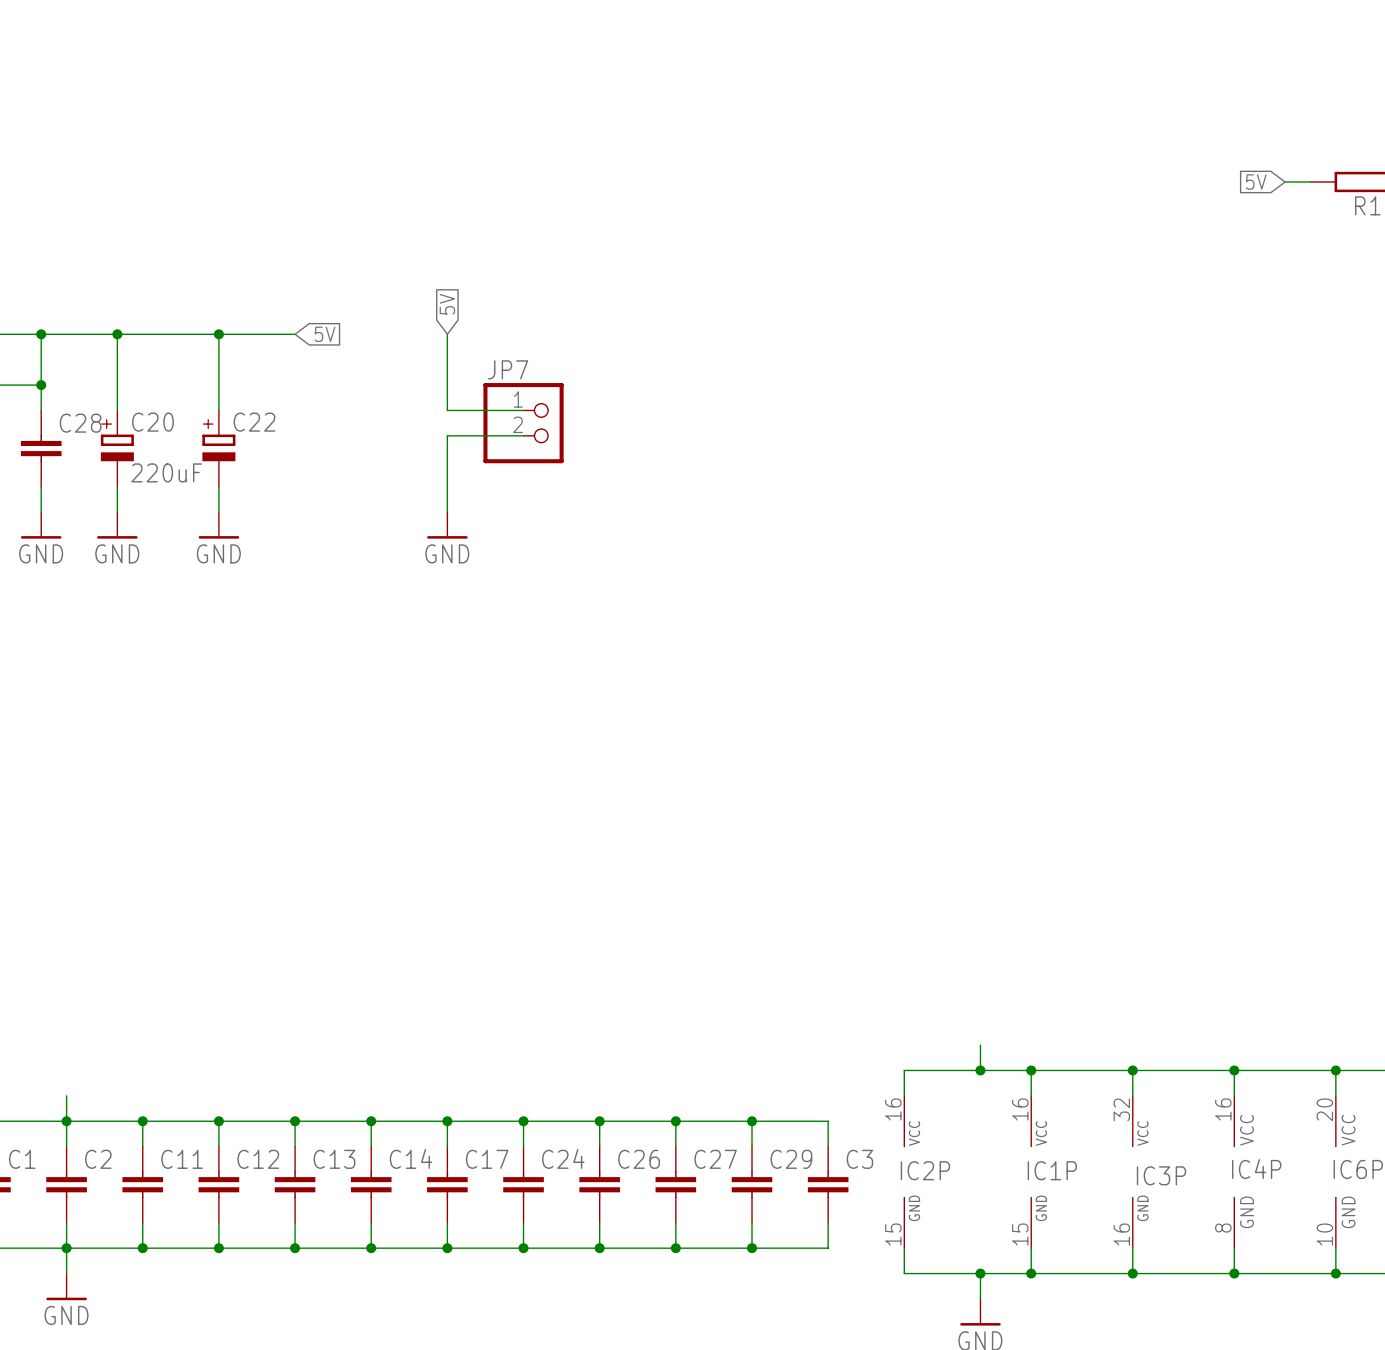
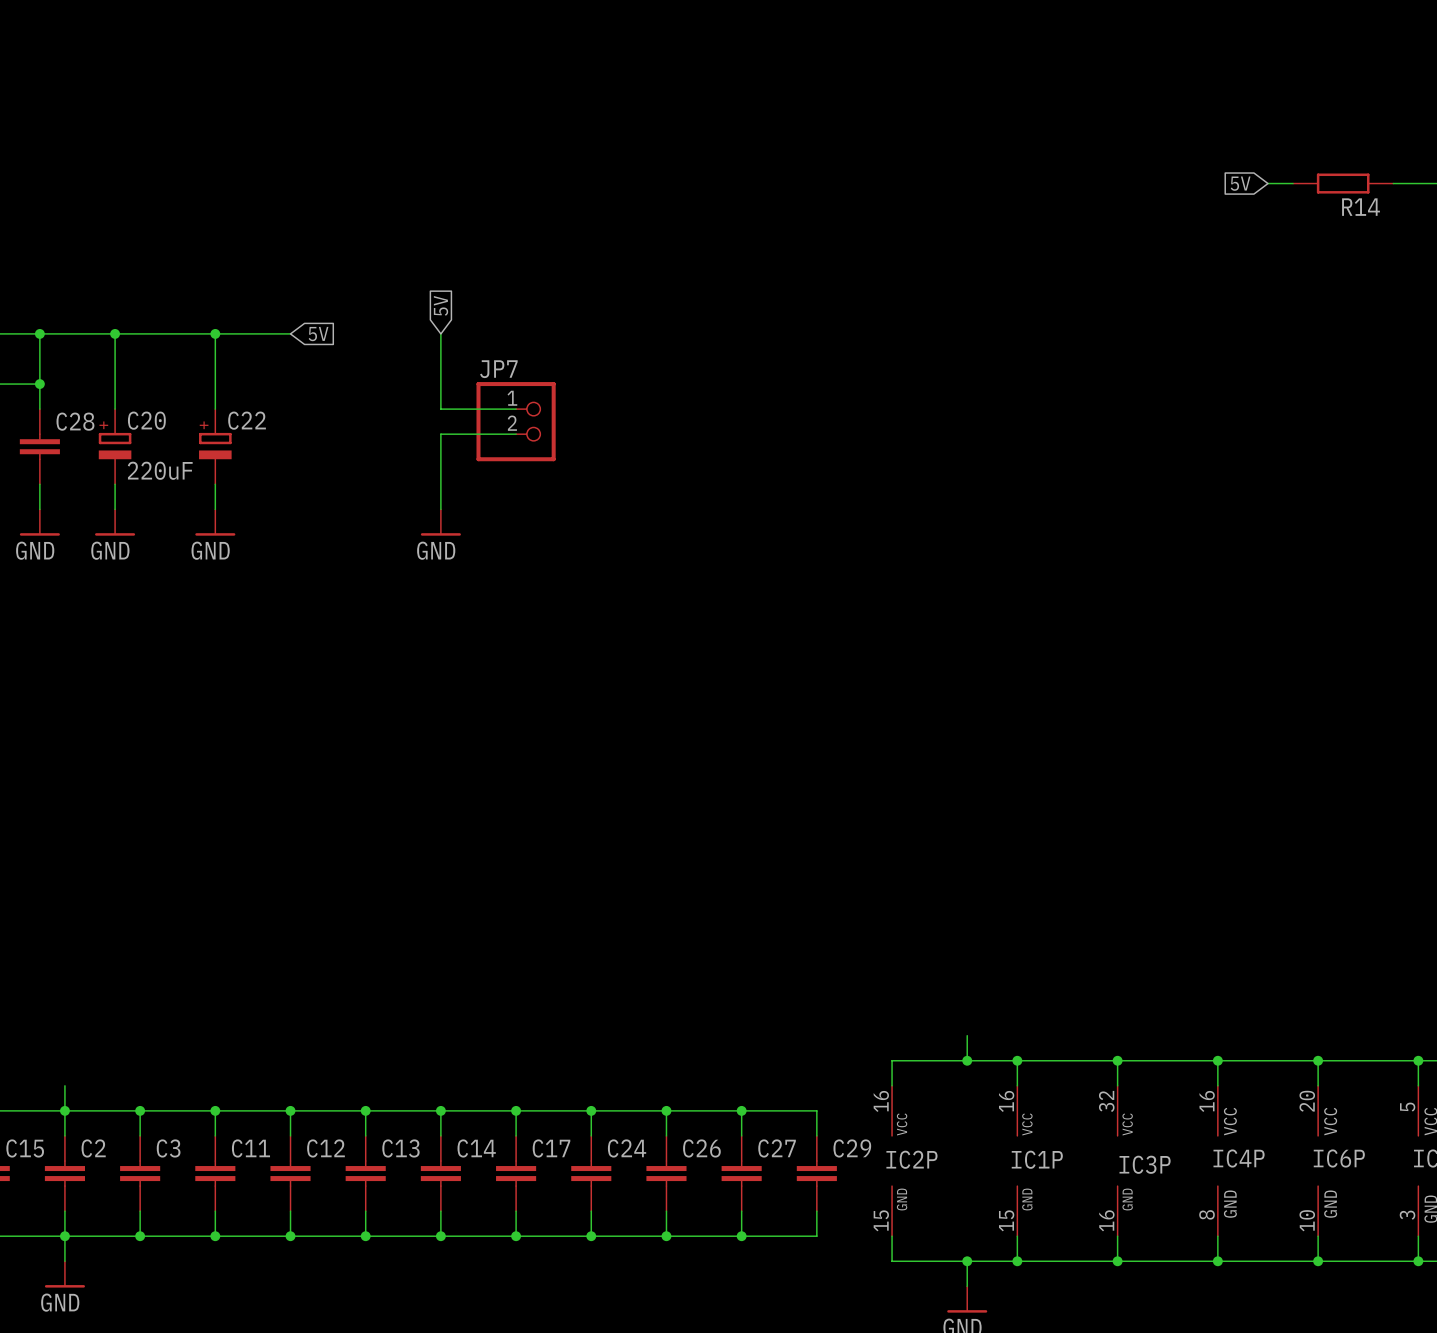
C14 name: C14 (410, 1158) -> C13 (400, 1148)
C24 name: C24 (563, 1158) -> C17 (551, 1148)
C1 name: C1 (22, 1159) -> C15 (25, 1148)
C11 name: C11 (182, 1159) -> C3 (168, 1148)
C12 name: C12 (258, 1159) -> C11 (250, 1148)
C13 name: C13 (334, 1159) -> C12 (325, 1148)
C17 name: C17 (487, 1159) -> C14 (476, 1148)
C26 name: C26 (639, 1159) -> C24 (627, 1148)
C27 name: C27 (715, 1159) -> C26 (701, 1148)
C29 name: C29 (791, 1159) -> C27 (777, 1148)
C3 name: C3 (859, 1159) -> C29 (852, 1148)

